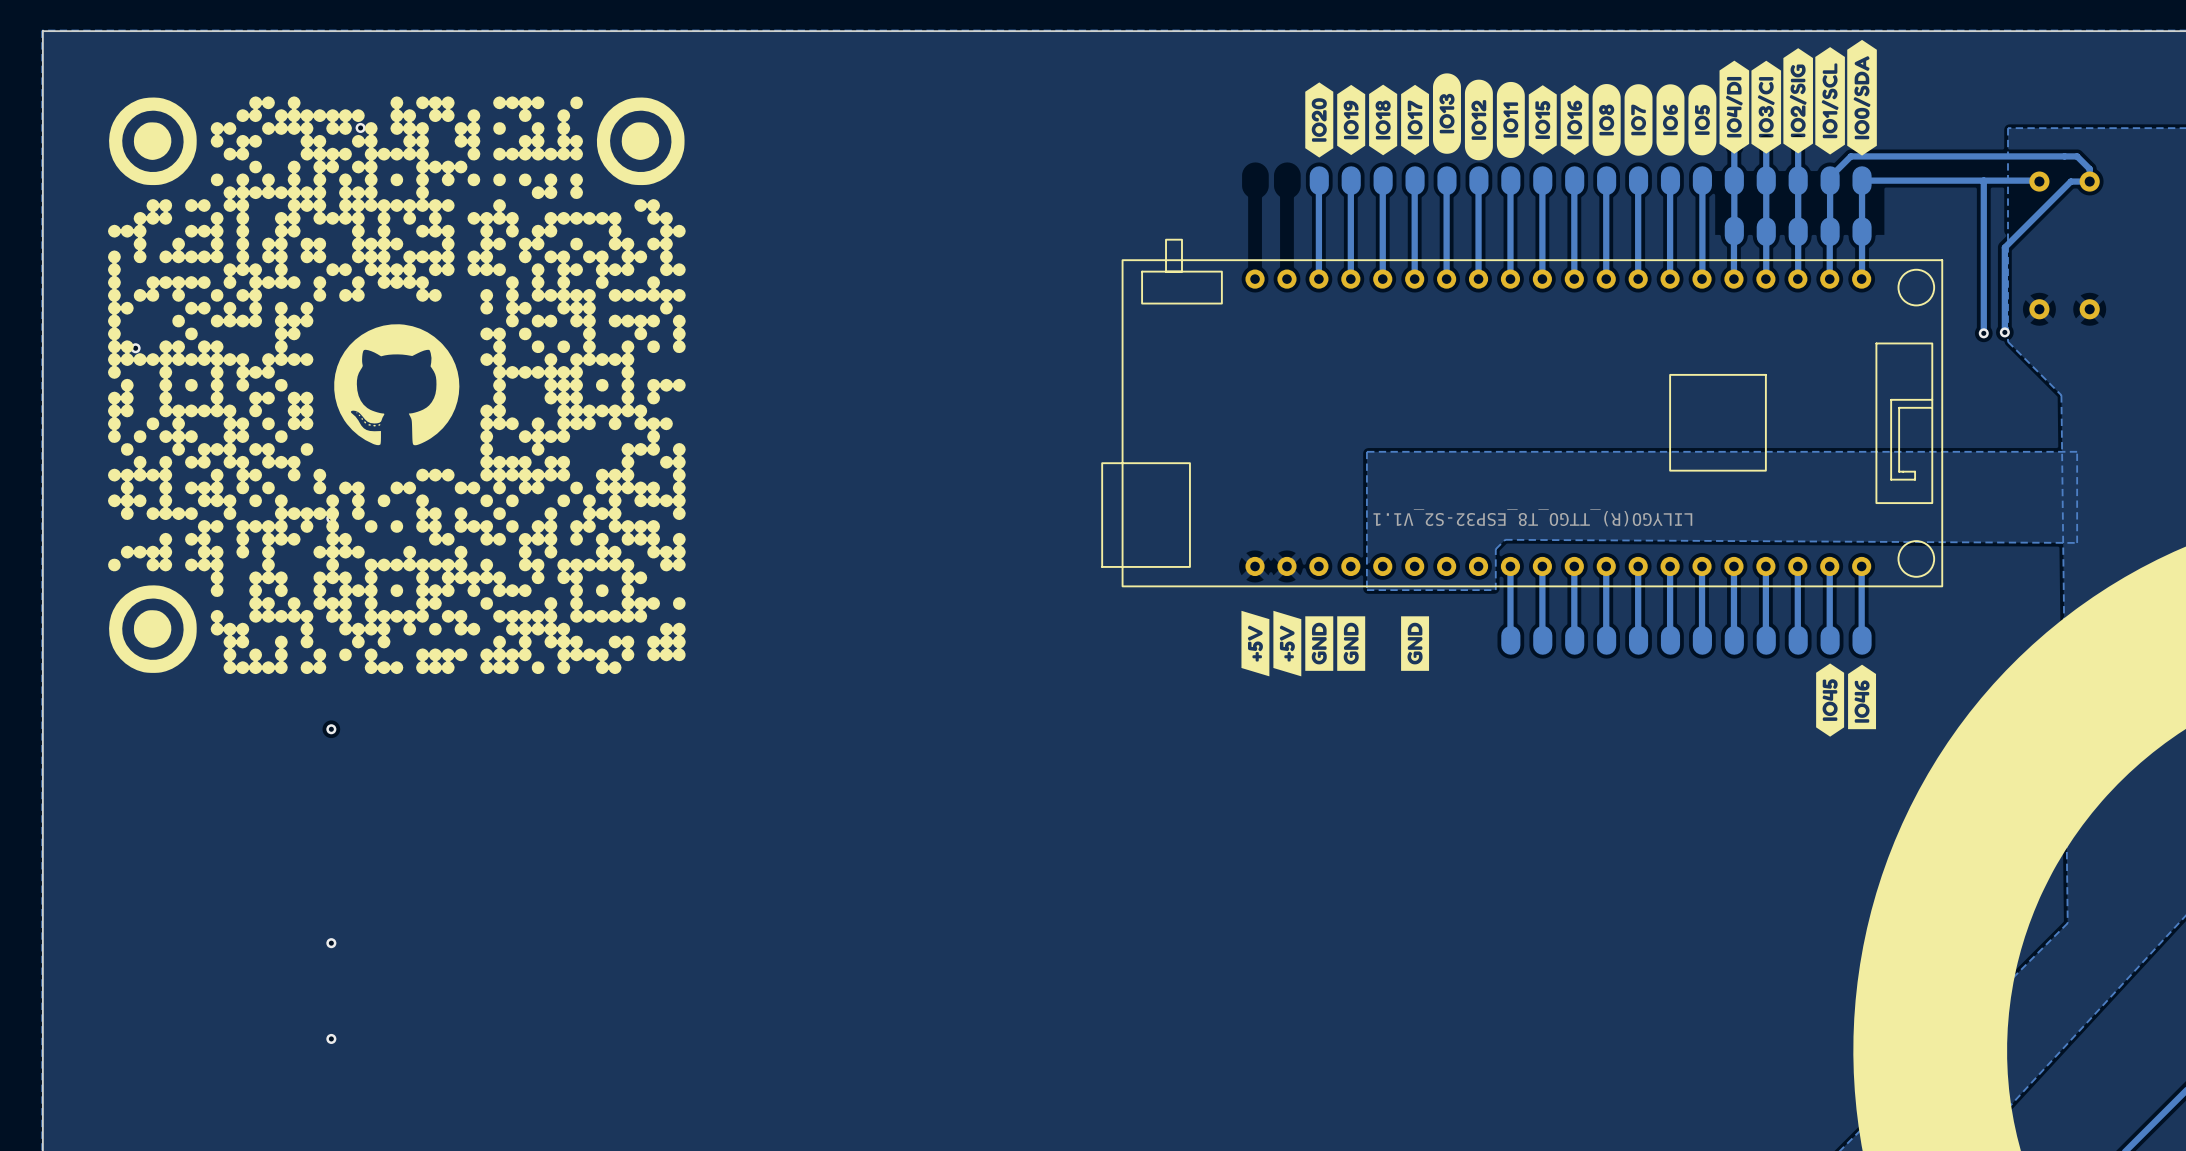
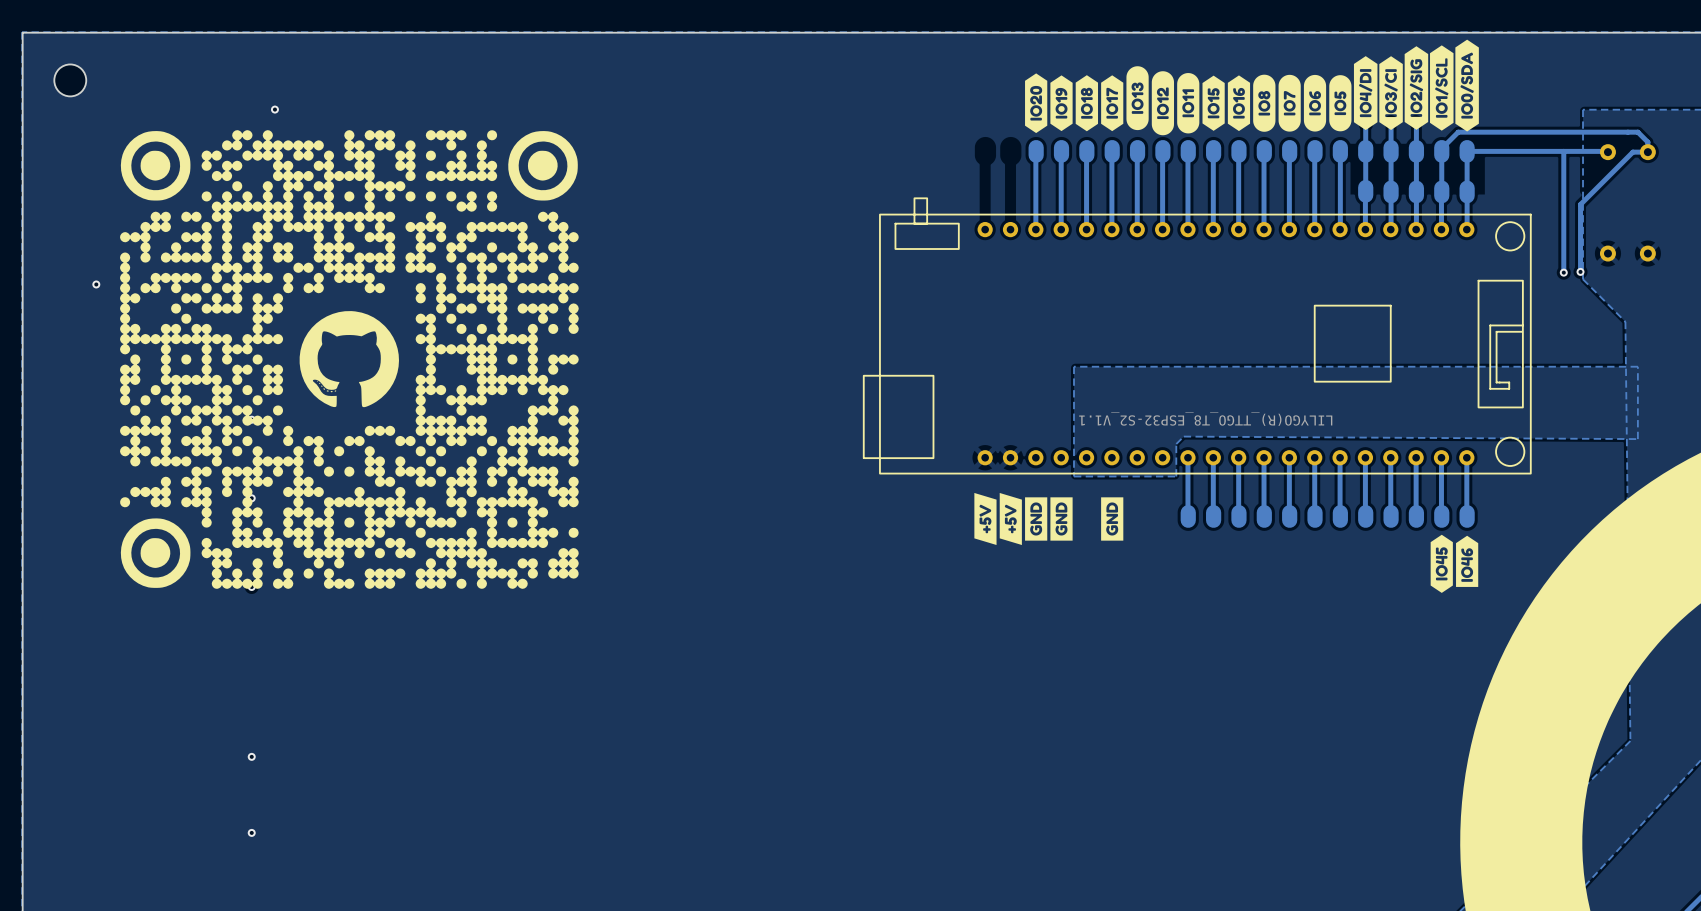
part: none -> (70, 80)
drawing position: (396, 385) -> (349, 359)

